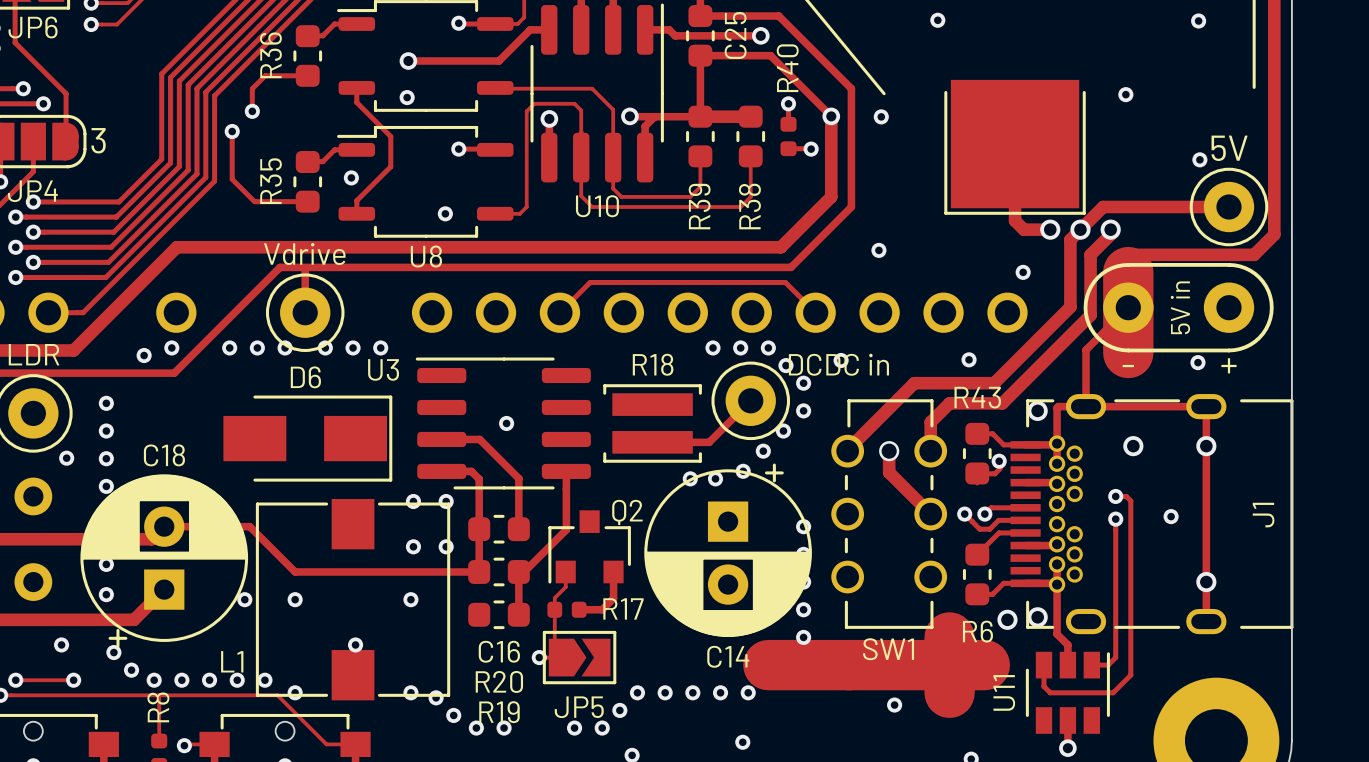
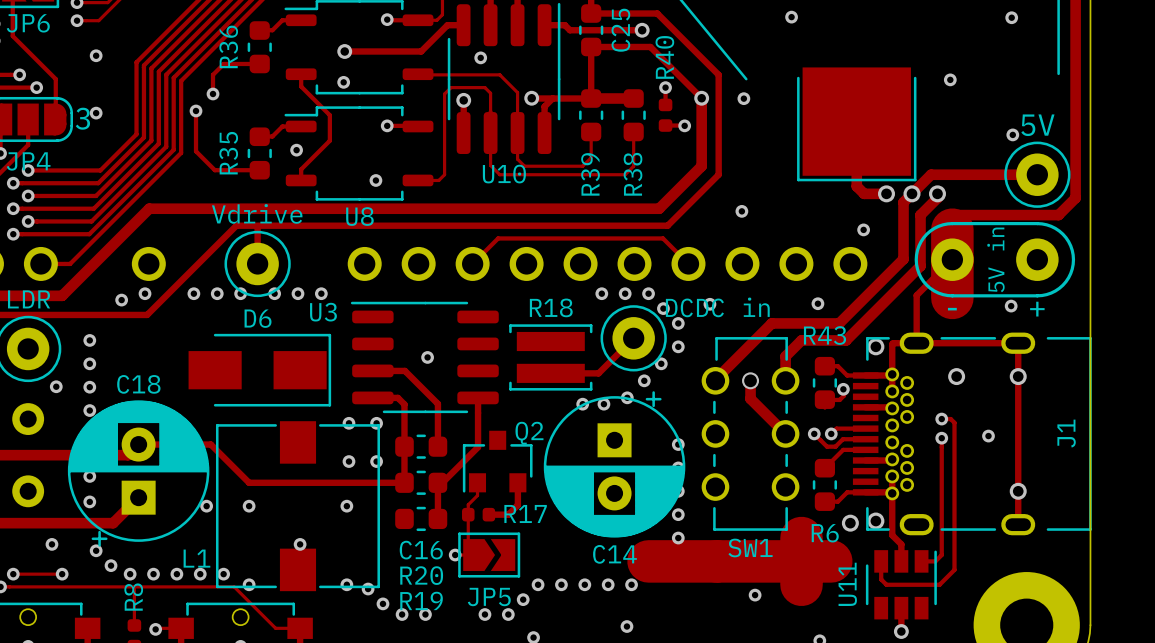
via: none -> (96, 55)
via: none -> (480, 57)
via: none -> (96, 113)

